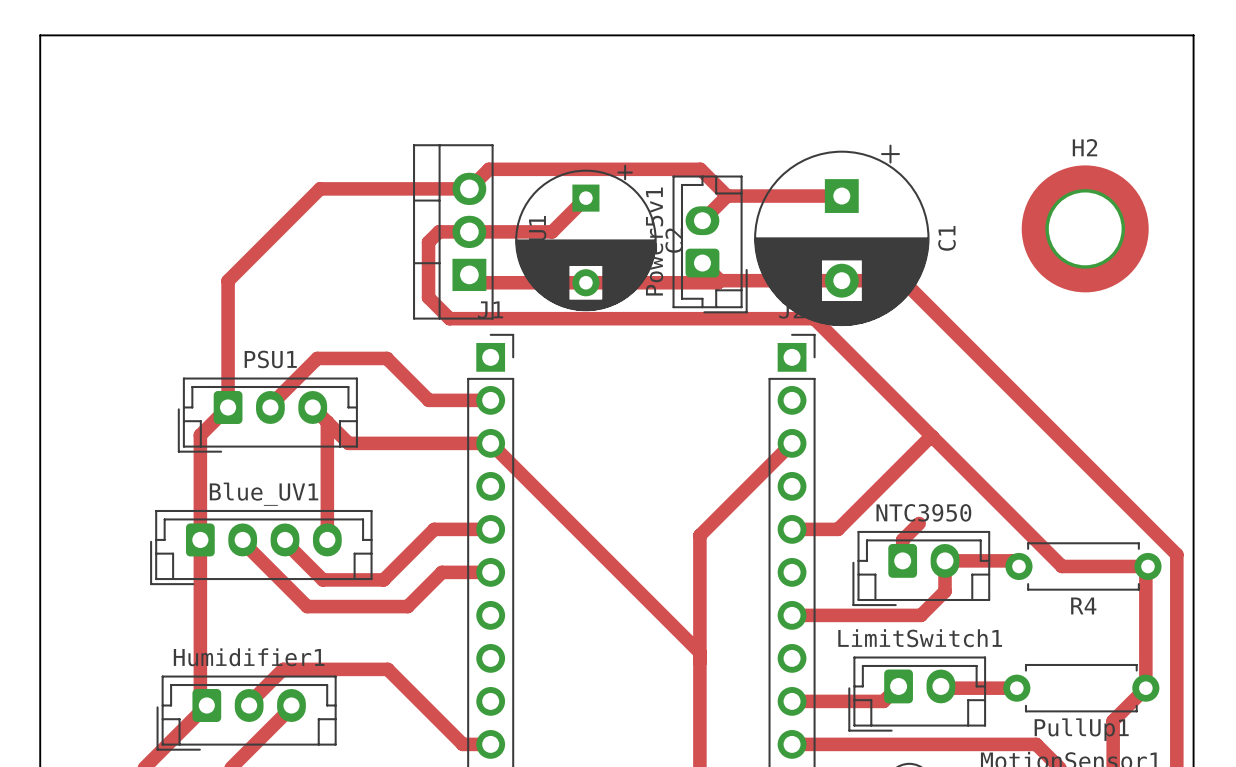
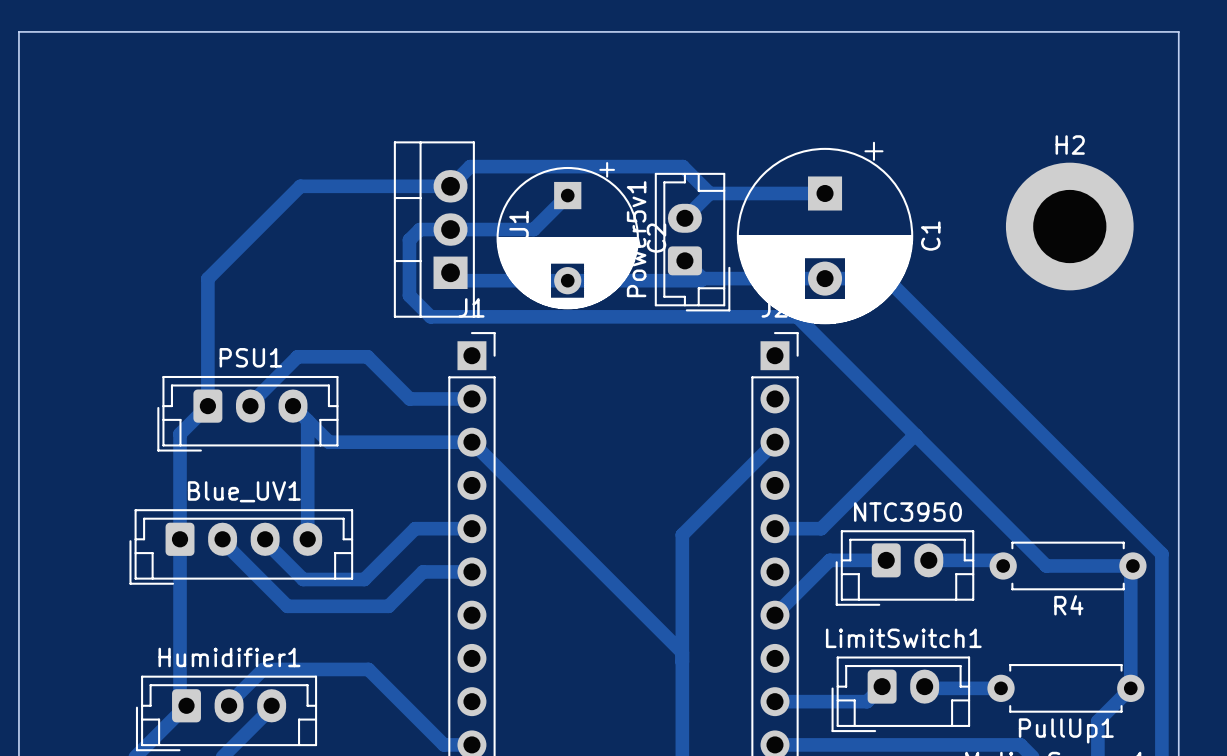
track: (919, 523) (902, 539) (902, 560) -> none
track: (945, 560) (945, 591) (920, 615) (792, 615) -> (886, 560) (829, 560) (774, 615)

